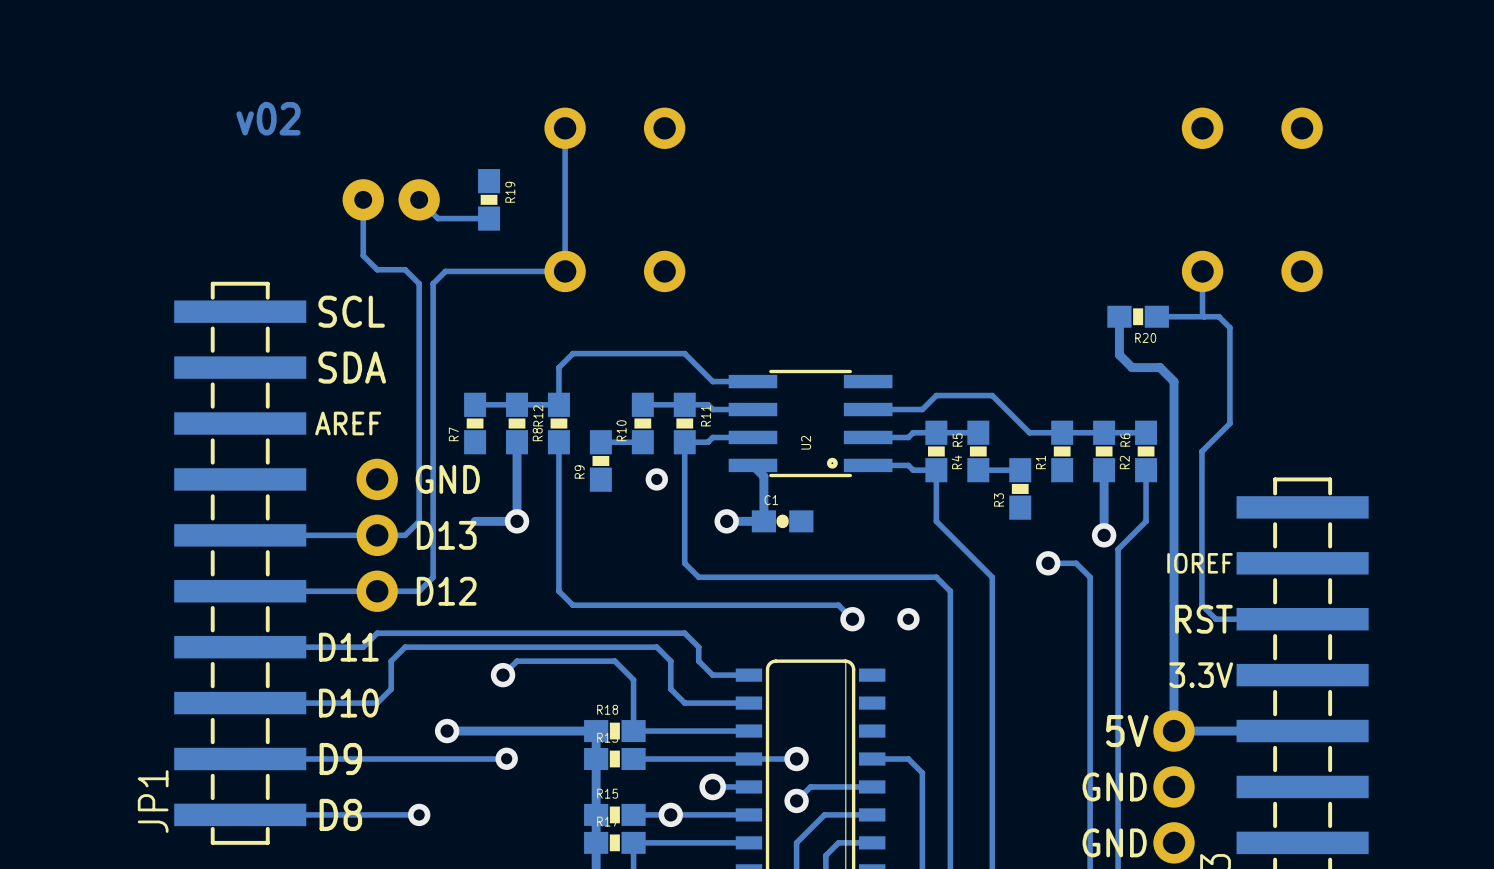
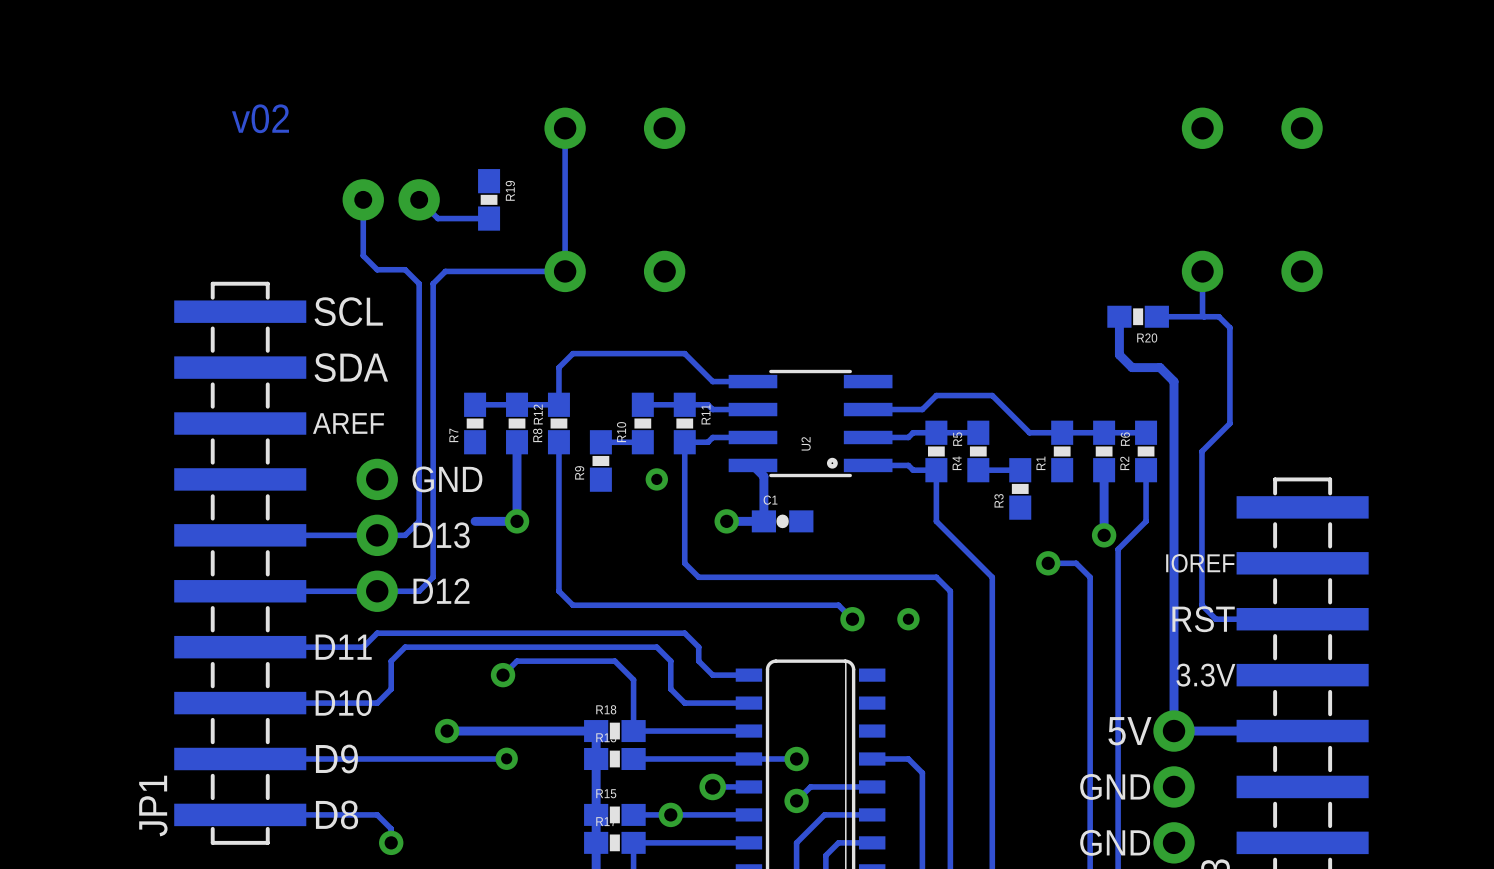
track: (419, 814) (377, 814) -> (391, 842) (391, 828) (377, 814)
via: (419, 814) -> none
via: none -> (391, 842)

